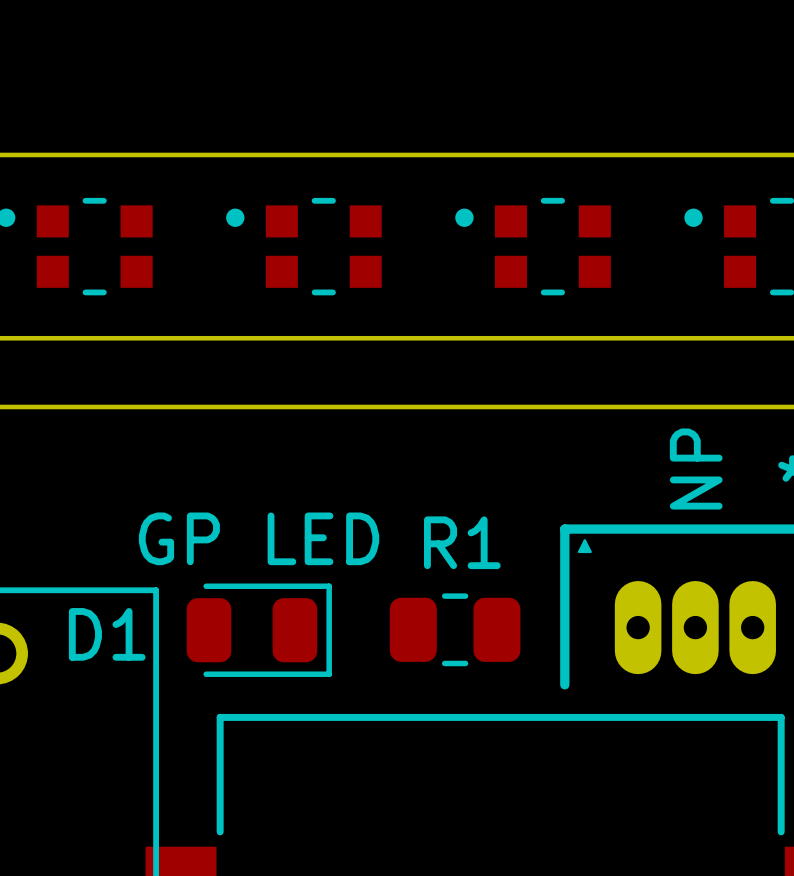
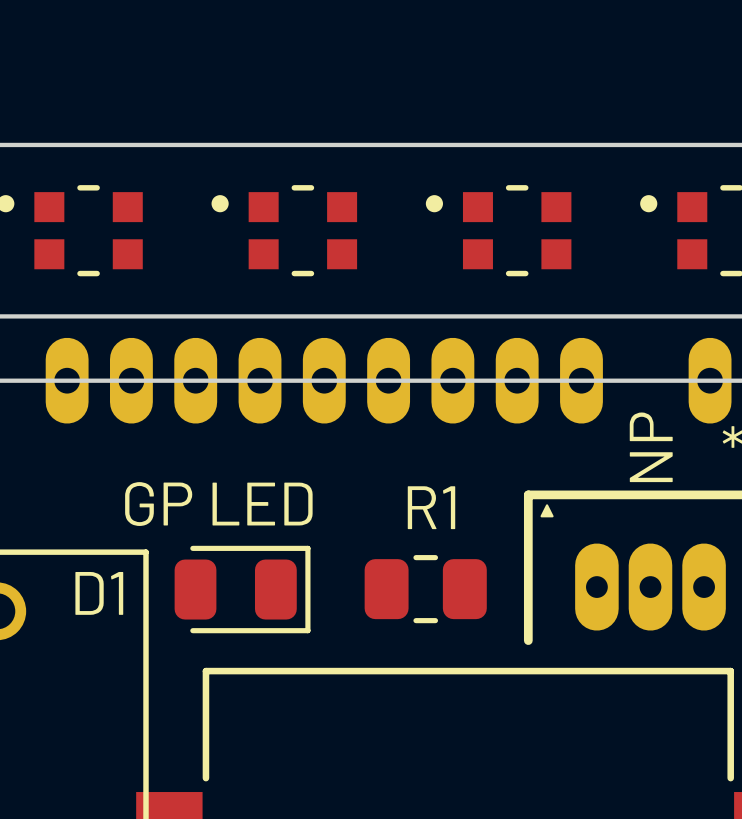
part: none -> (67, 380)
part: none -> (131, 380)
part: none -> (195, 380)
part: none -> (260, 380)
part: none -> (324, 380)
part: none -> (388, 380)
part: none -> (452, 380)
part: none -> (517, 380)
part: none -> (581, 380)
part: none -> (710, 380)

